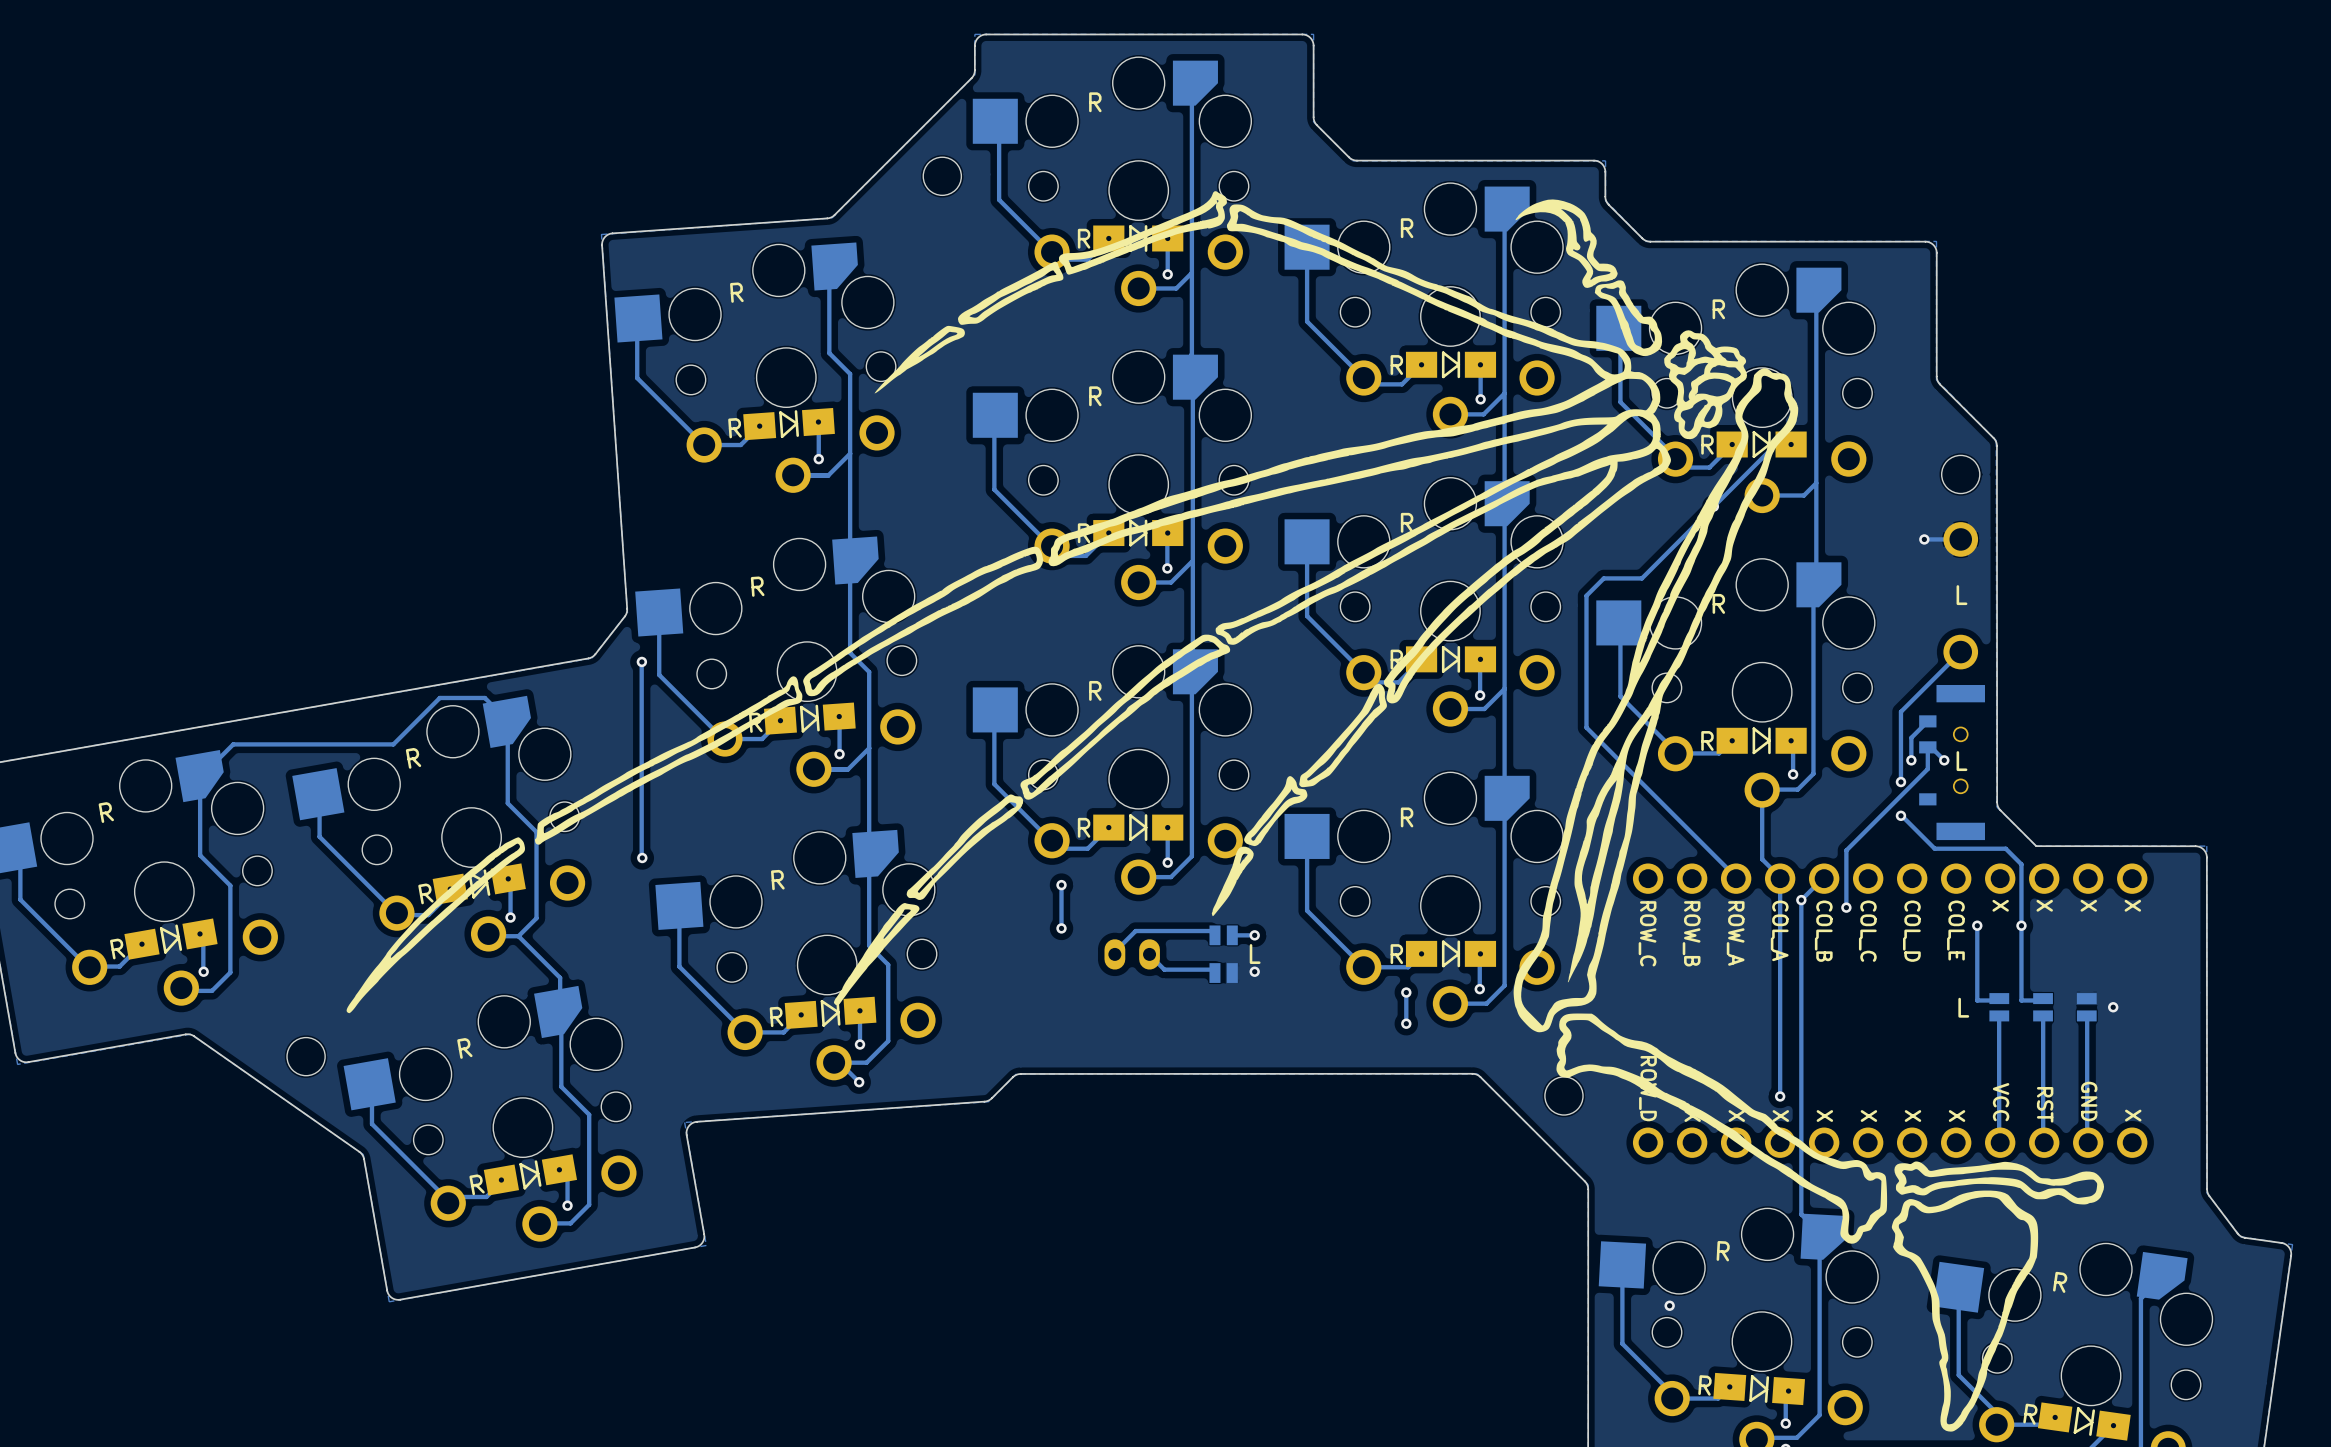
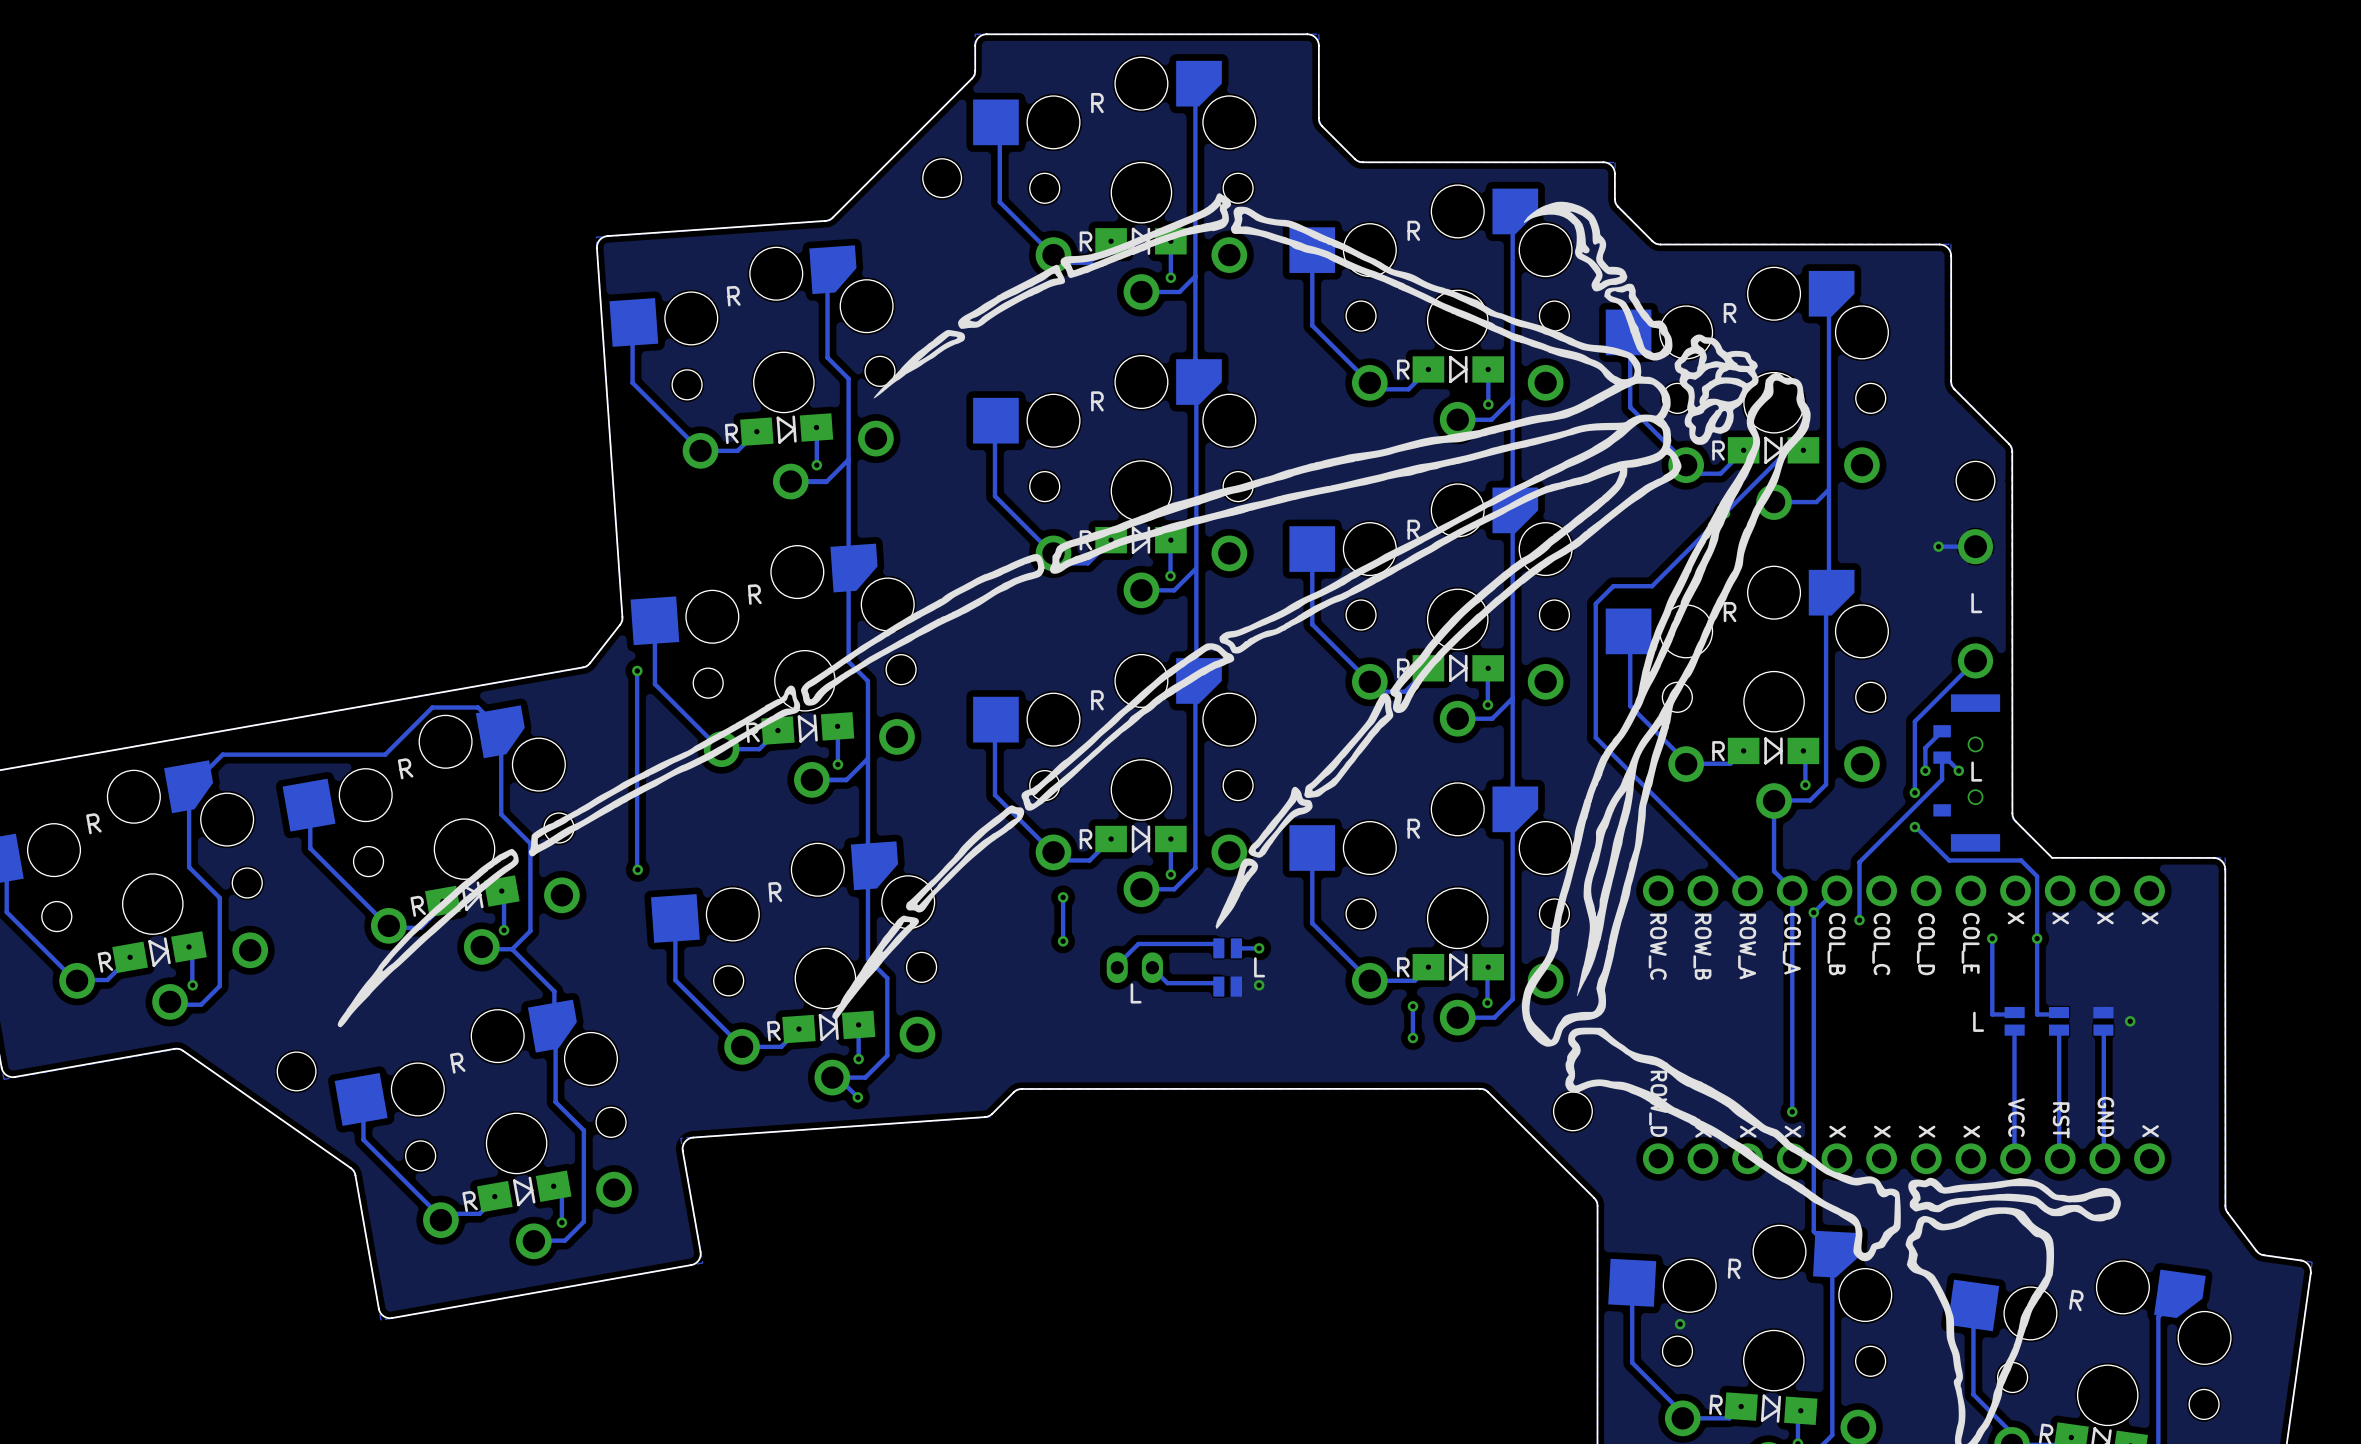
part text: none -> L (1136, 993)

